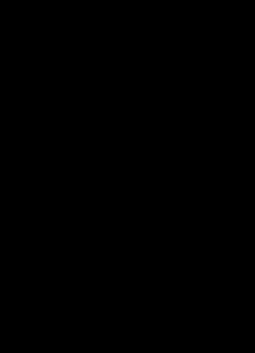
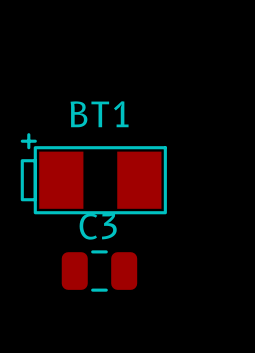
BT1: none -> (93, 173)
C3: none -> (99, 271)

